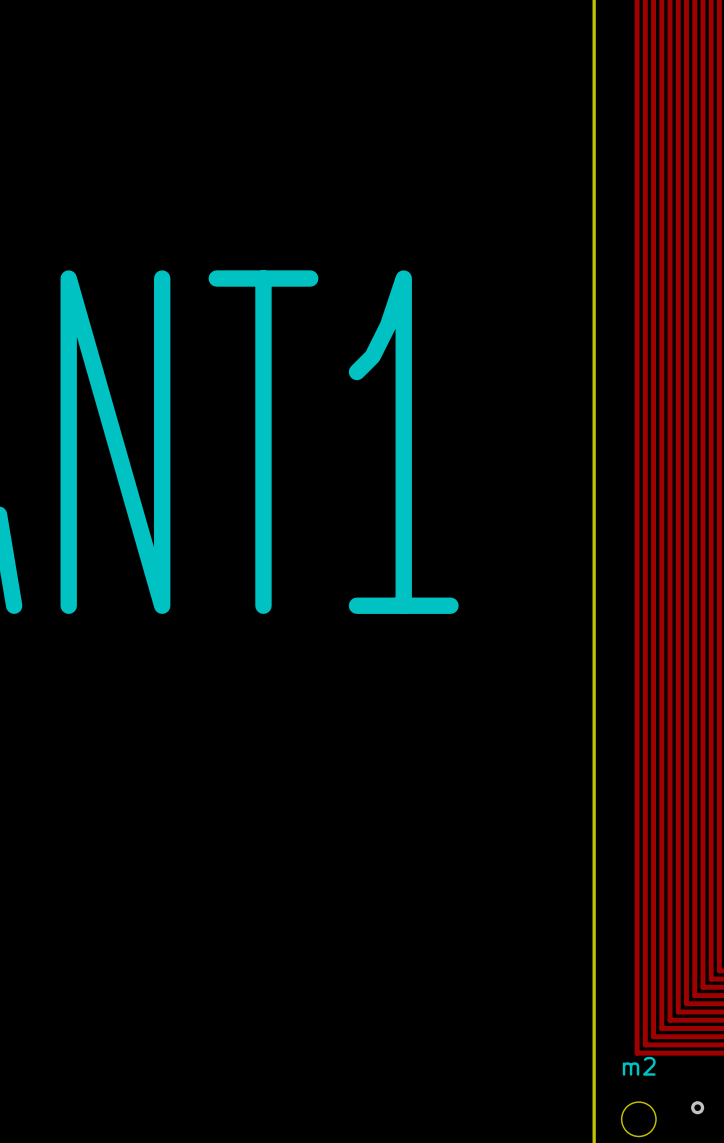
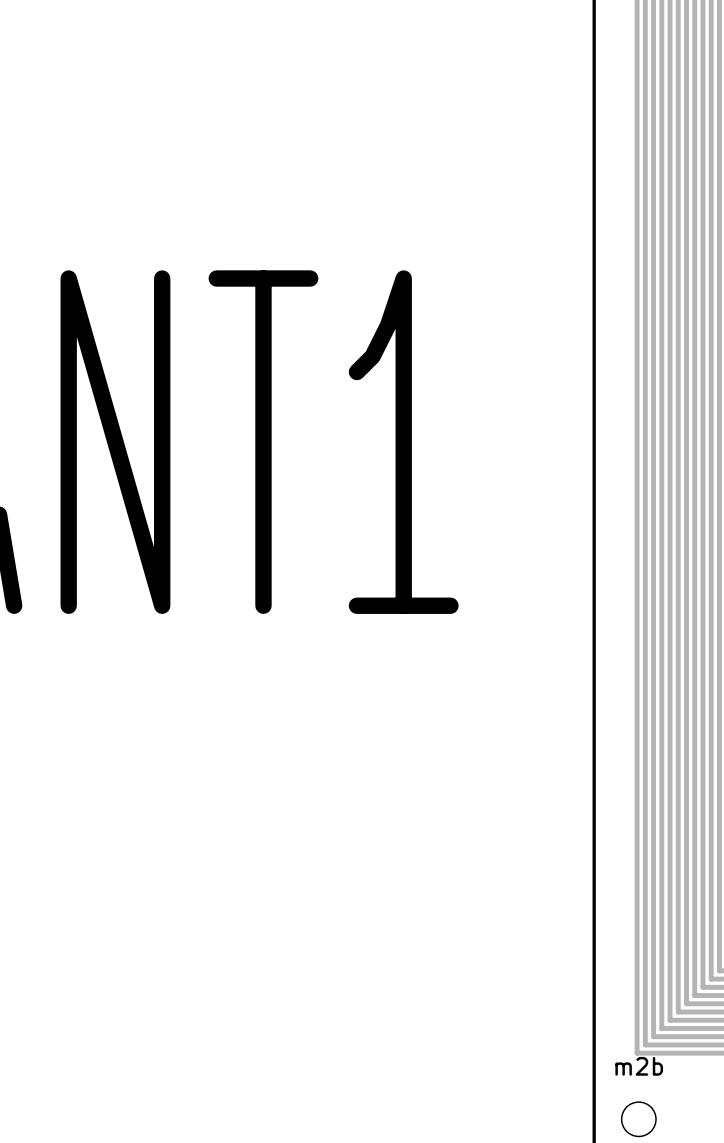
m2 name: m2 (639, 1066) -> m2b (639, 1066)
via: (697, 1107) -> none

